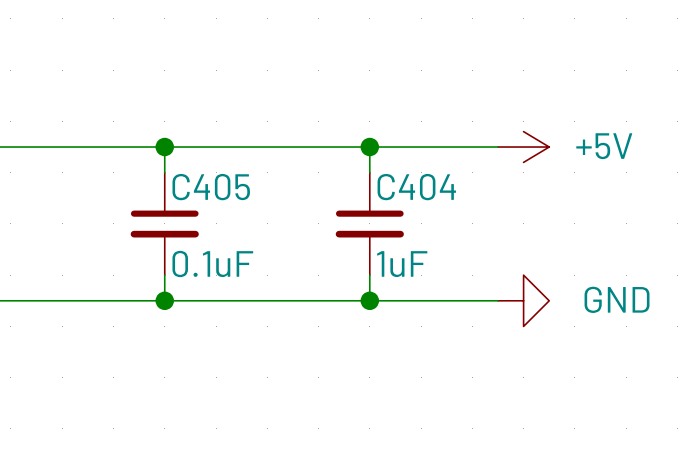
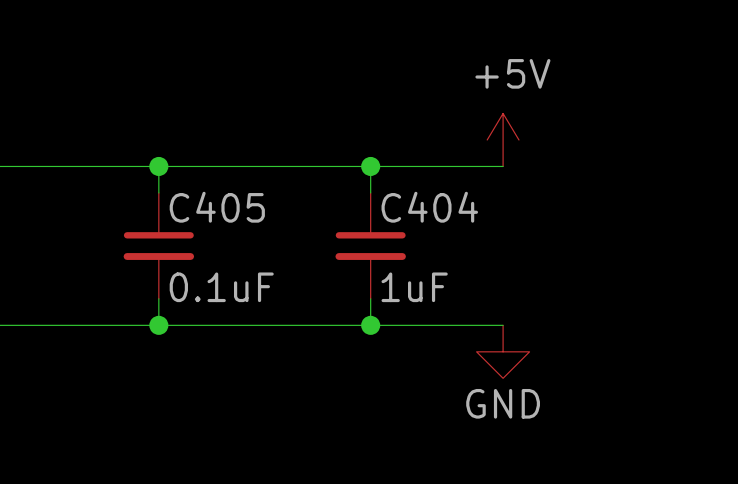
power symbol rotation: 0° (523, 147) -> 90° counterclockwise (503, 139)
power symbol position: +5V (523, 147) -> +5V (503, 139)
power symbol rotation: 0° (523, 300) -> 90° clockwise (503, 351)
power symbol position: GND (523, 300) -> GND (503, 351)

